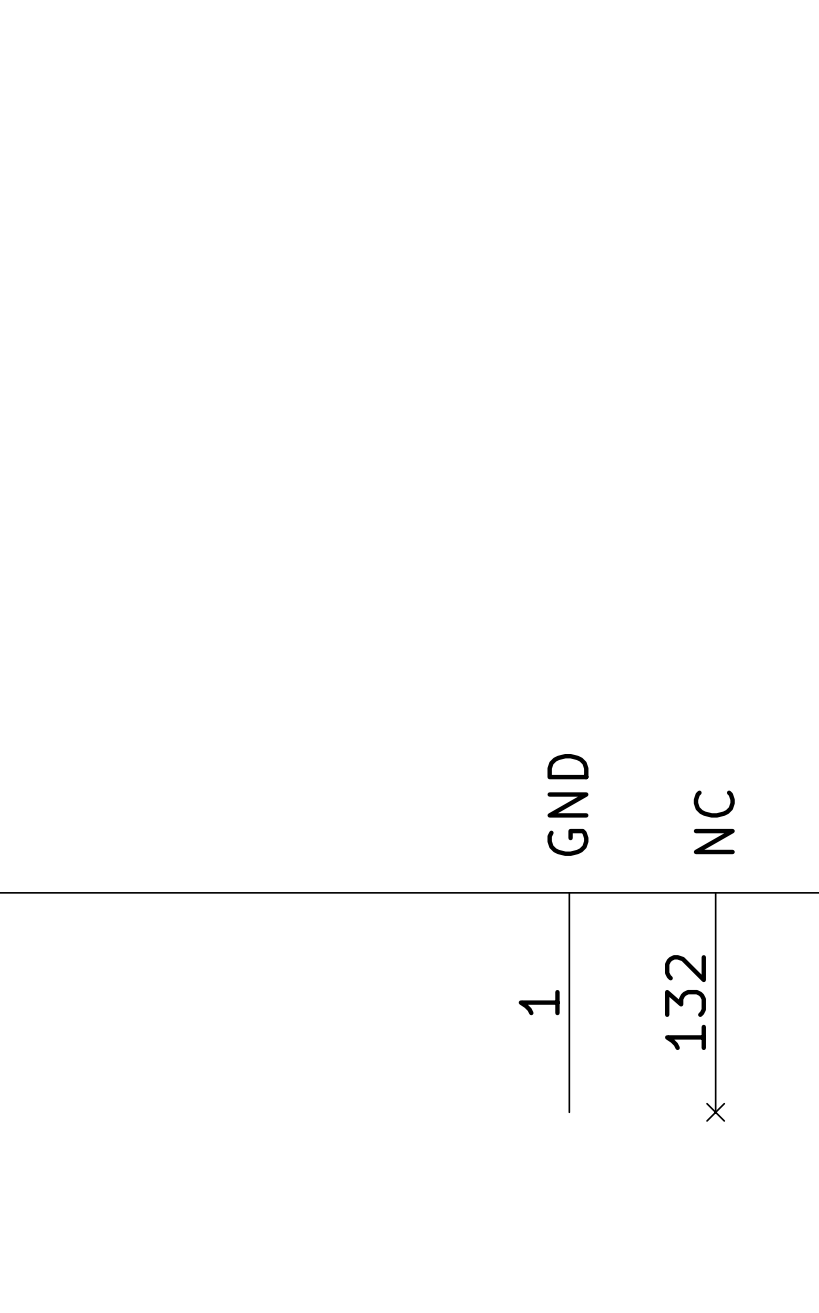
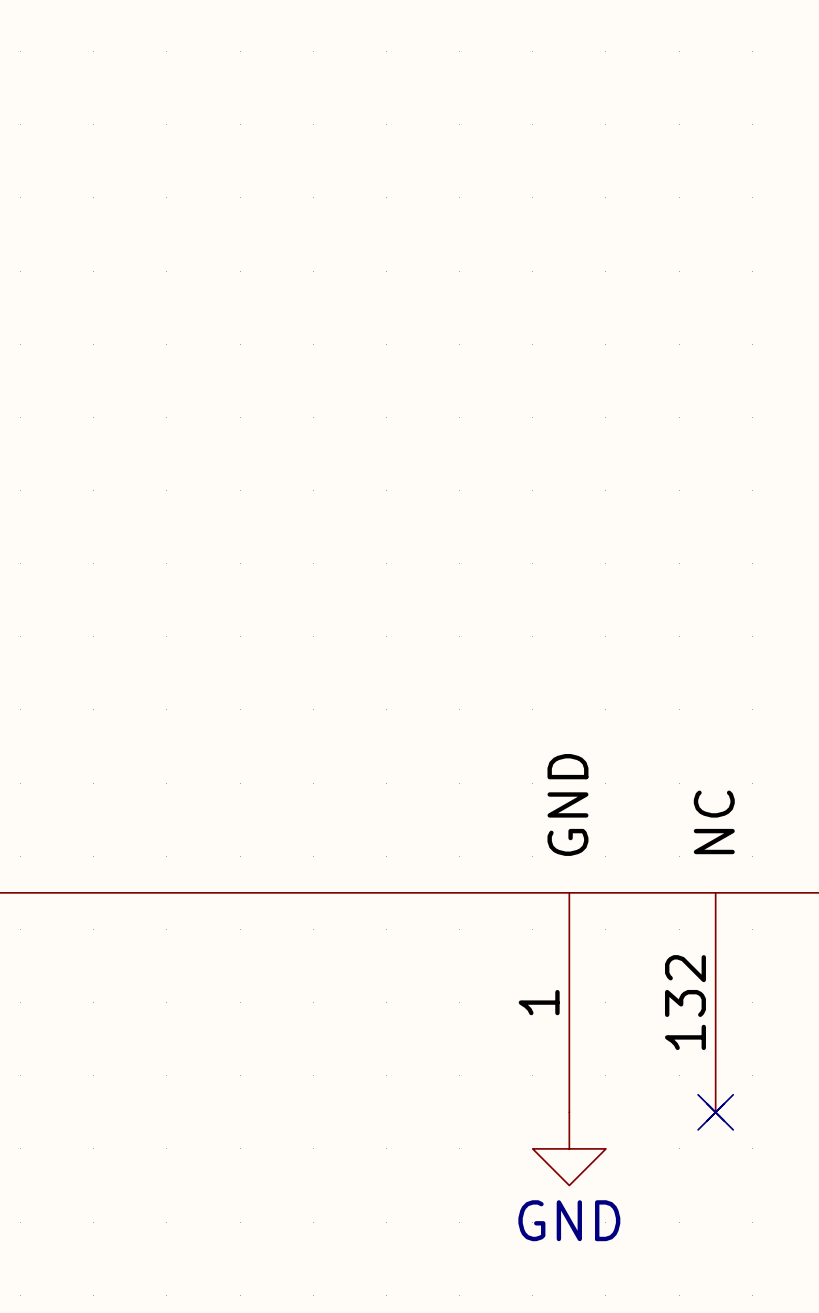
no-connect mark: none -> (715, 1112)
power symbol: none -> GND (569, 1148)

